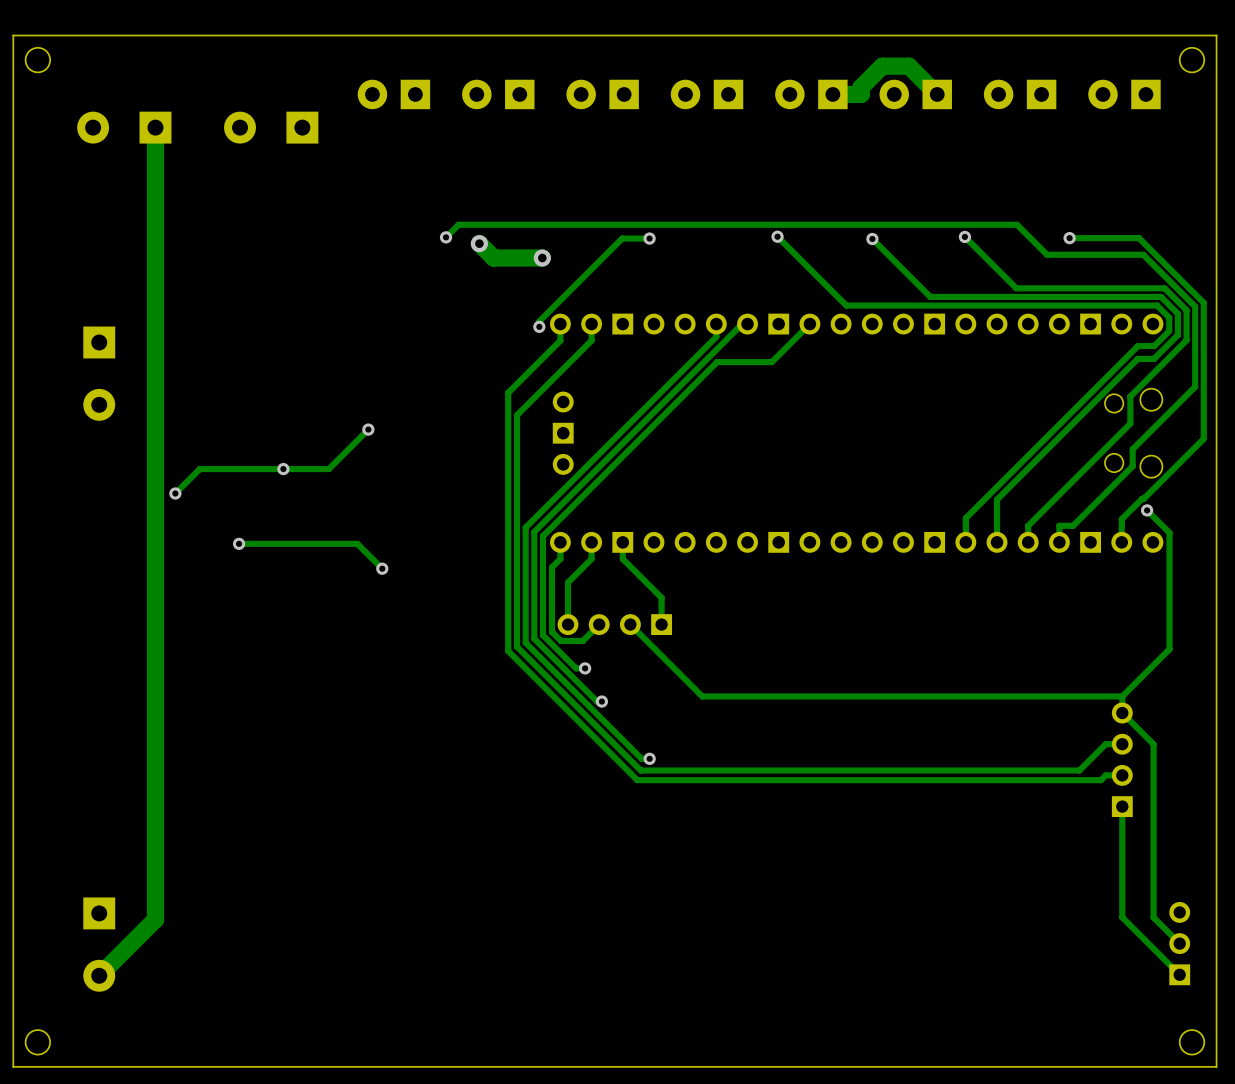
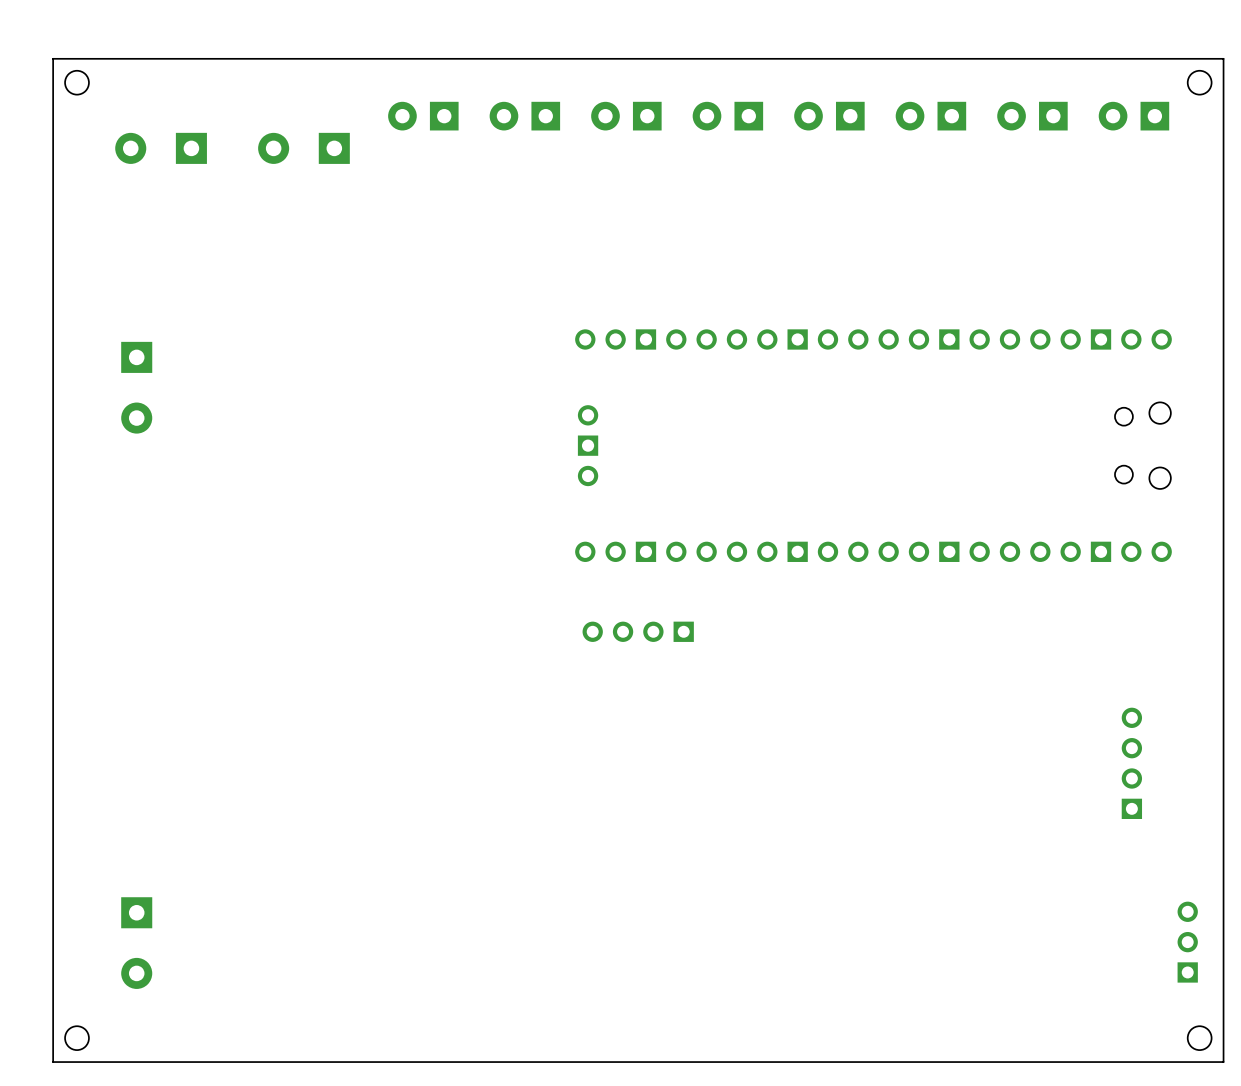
track: (937, 94) (908, 66) (882, 66) (861, 87) (861, 94) (832, 94) -> none
track: (155, 127) (155, 919) (99, 975) -> none
track: (777, 236) (846, 305) (1157, 305) (1169, 317) (1169, 331) (1154, 346) (1137, 346) (965, 518) (965, 542) -> none
via: (777, 236) -> none
track: (964, 236) (1016, 288) (1164, 288) (1186, 310) (1186, 340) (1130, 396) (1130, 423) (1028, 525) (1028, 542) -> none
via: (964, 236) -> none
track: (446, 237) (458, 224) (1017, 224) (1047, 254) (1143, 254) (1195, 306) (1195, 386) (1132, 449) (1132, 466) (1073, 525) (1059, 525) (1059, 542) -> none
via: (446, 237) -> none
track: (649, 238) (622, 238) (539, 321) (539, 326) -> none
via: (649, 238) -> none
track: (1069, 238) (1139, 238) (1203, 302) (1203, 438) (1121, 519) (1121, 542) -> none
via: (1069, 238) -> none
track: (872, 239) (930, 296) (1161, 296) (1177, 313) (1177, 334) (1153, 358) (1137, 358) (997, 499) (997, 542) -> none
via: (872, 239) -> none
track: (479, 243) (493, 258) (542, 258) -> none
via: (479, 243) -> none
via: (542, 258) -> none
track: (560, 324) (560, 340) (508, 392) (508, 651) (637, 780) (1100, 780) (1105, 775) (1122, 775) -> none
track: (591, 324) (591, 340) (517, 415) (517, 646) (640, 770) (1079, 770) (1105, 744) (1122, 744) -> none
track: (716, 324) (716, 336) (525, 527) (525, 642) (641, 758) (649, 758) -> none
track: (747, 324) (742, 324) (534, 531) (534, 638) (597, 701) (601, 701) -> none
track: (809, 324) (771, 362) (717, 362) (542, 536) (542, 635) (576, 668) (585, 668) -> none
via: (539, 326) -> none
track: (368, 429) (328, 469) (199, 469) (175, 493) -> none
via: (368, 429) -> none
via: (283, 469) -> none
via: (175, 493) -> none
track: (1147, 510) (1169, 532) (1169, 649) (1122, 696) -> none
via: (1147, 510) -> none
track: (560, 542) (560, 558) (551, 567) (551, 632) (560, 640) (582, 640) (599, 624) -> none
track: (591, 542) (591, 558) (568, 582) (568, 624) -> none
track: (622, 542) (622, 558) (661, 597) (661, 624) -> none
track: (239, 543) (357, 543) (382, 568) -> none
via: (239, 543) -> none
via: (382, 568) -> none
track: (630, 624) (702, 696) (1122, 696) -> none
via: (585, 668) -> none
track: (1122, 696) (1122, 713) (1153, 744) (1153, 917) (1179, 943) -> none
via: (601, 701) -> none
via: (649, 758) -> none
track: (1122, 806) (1122, 917) (1179, 974) -> none

